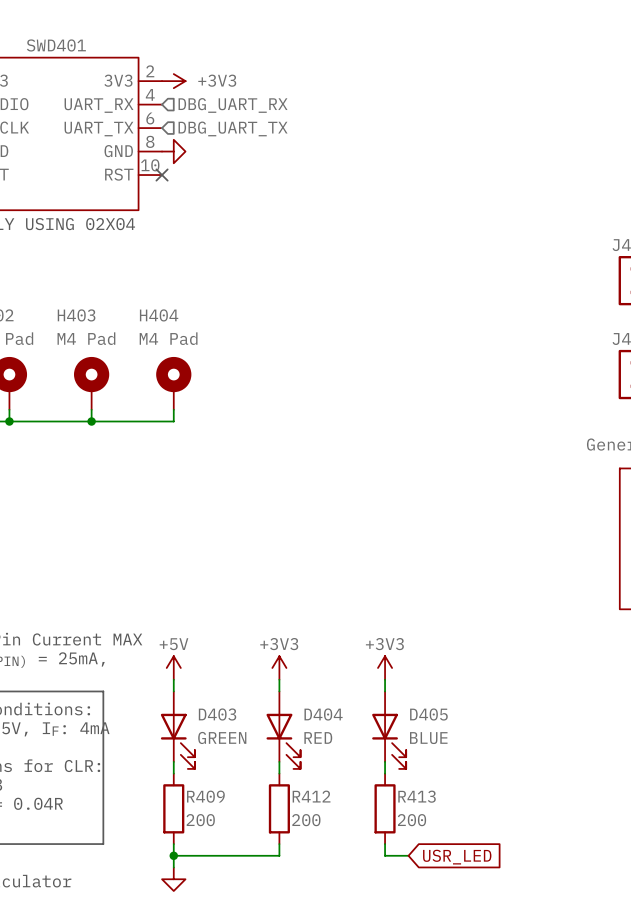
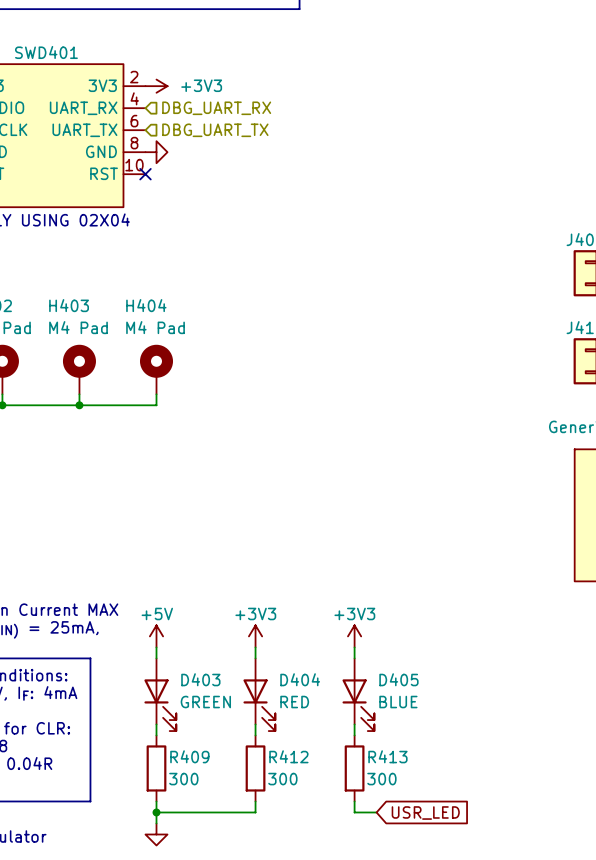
R409 value: 200 (200, 820) -> 300 (183, 779)
R412 value: 200 (306, 820) -> 300 (282, 779)
R413 value: 200 (411, 820) -> 300 (381, 779)

